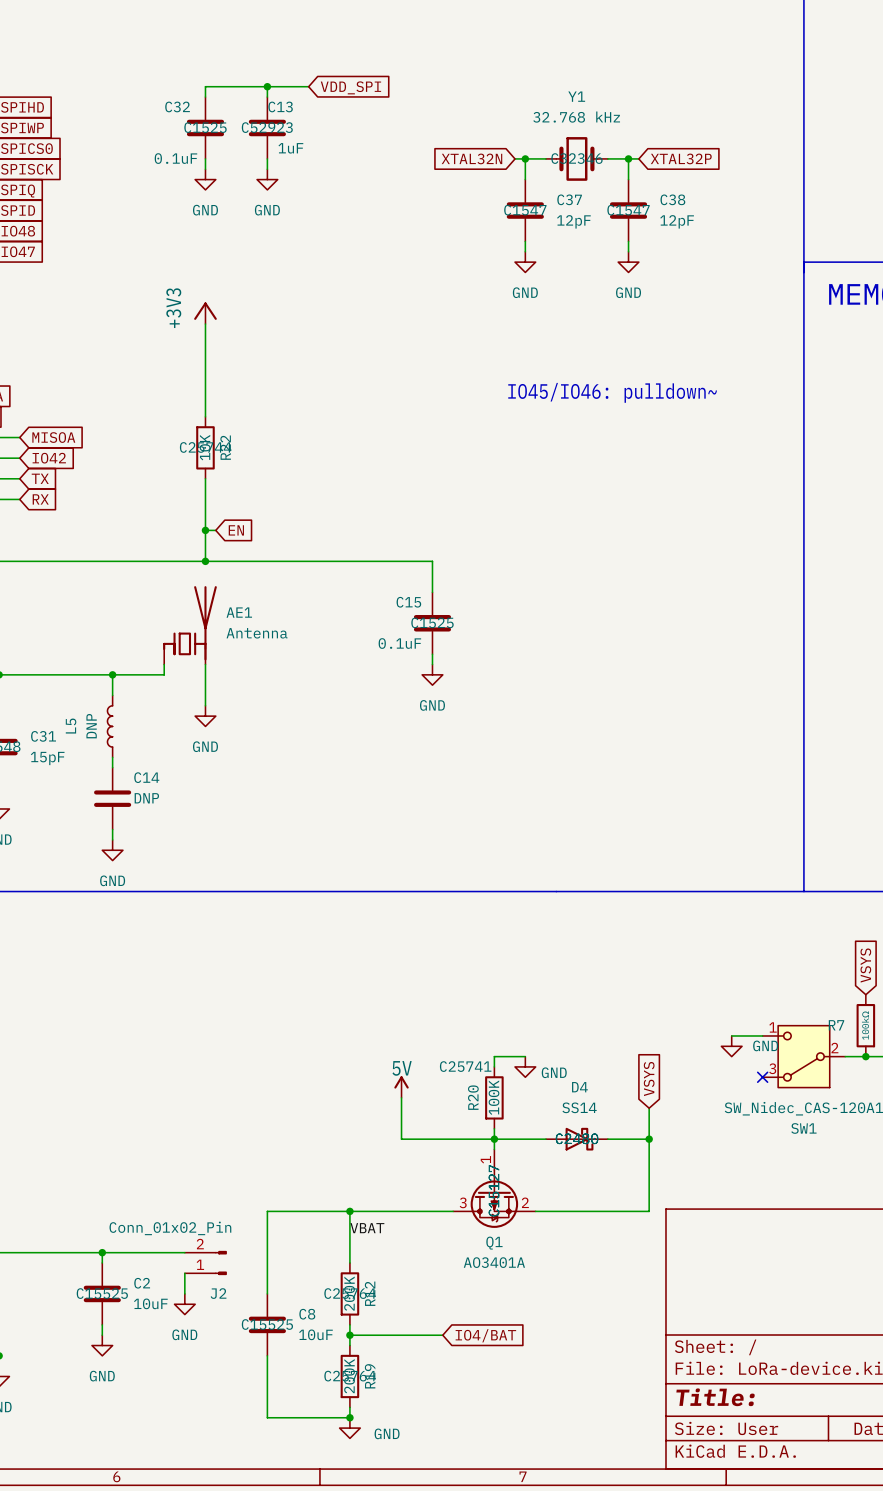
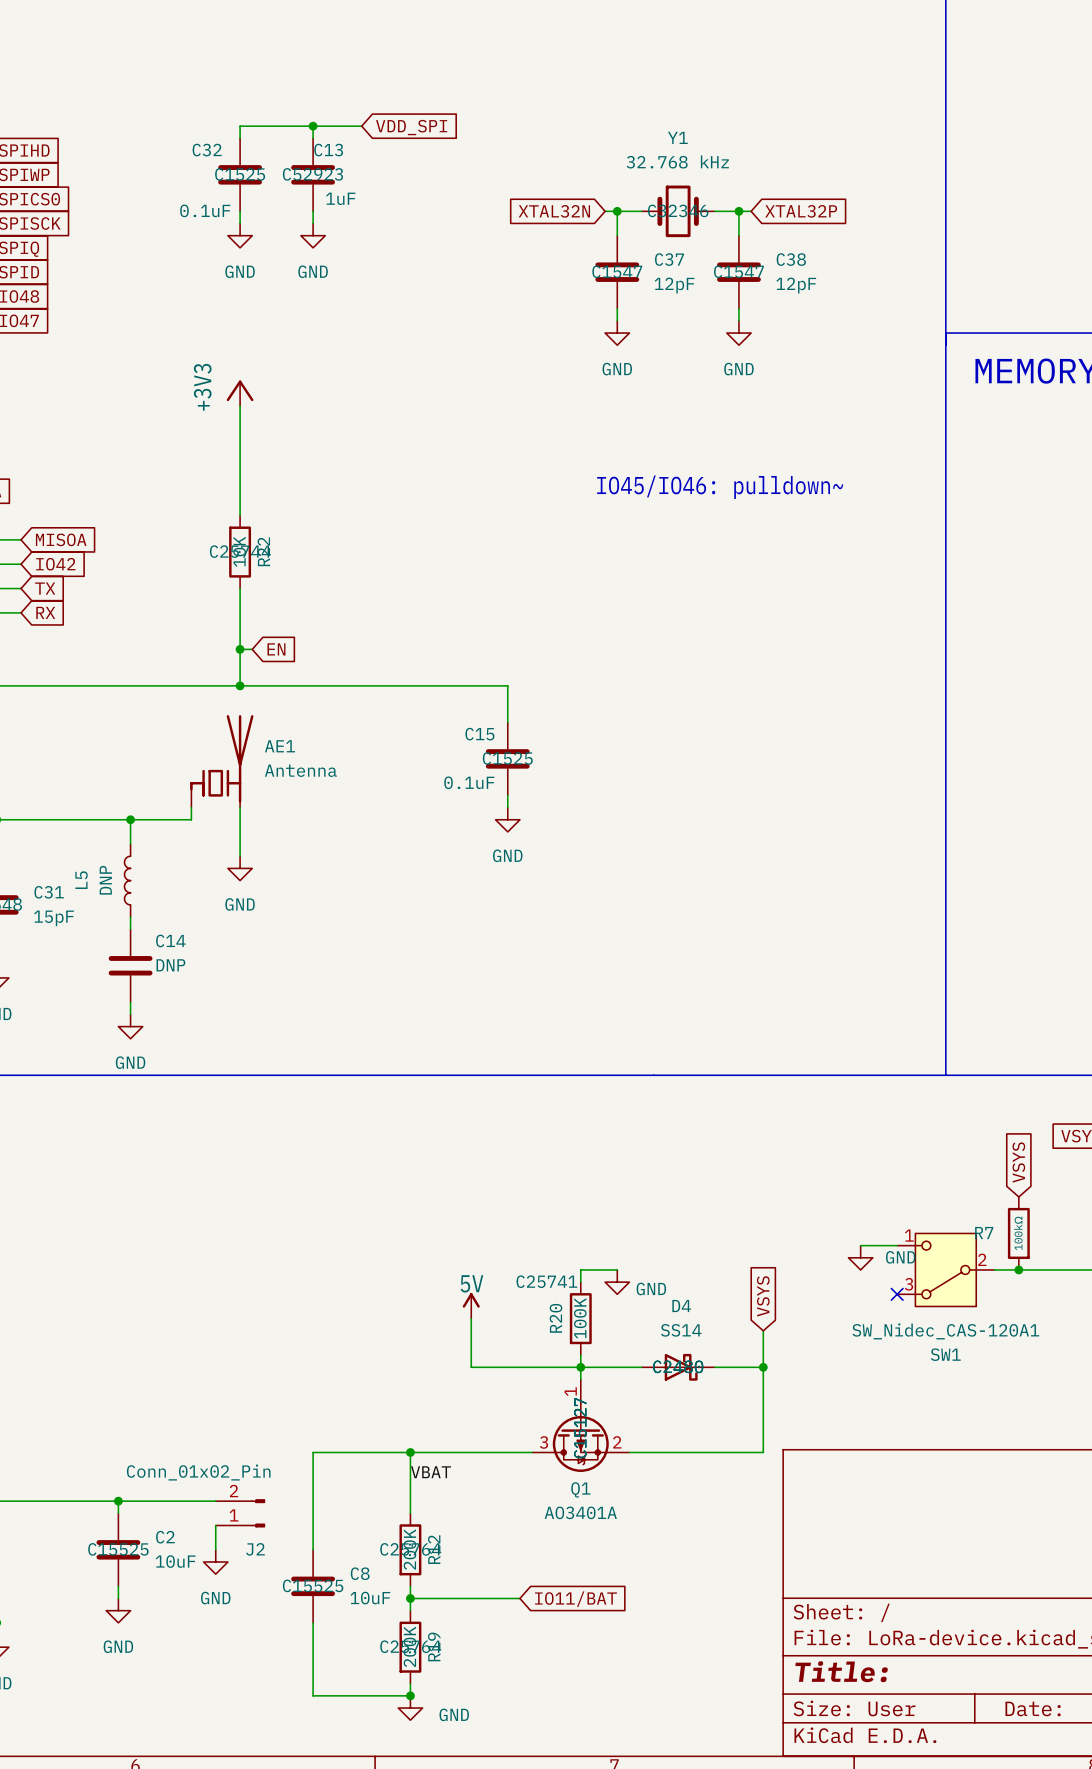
global label: IO4/BAT (485, 1335) -> IO11/BAT (575, 1599)

